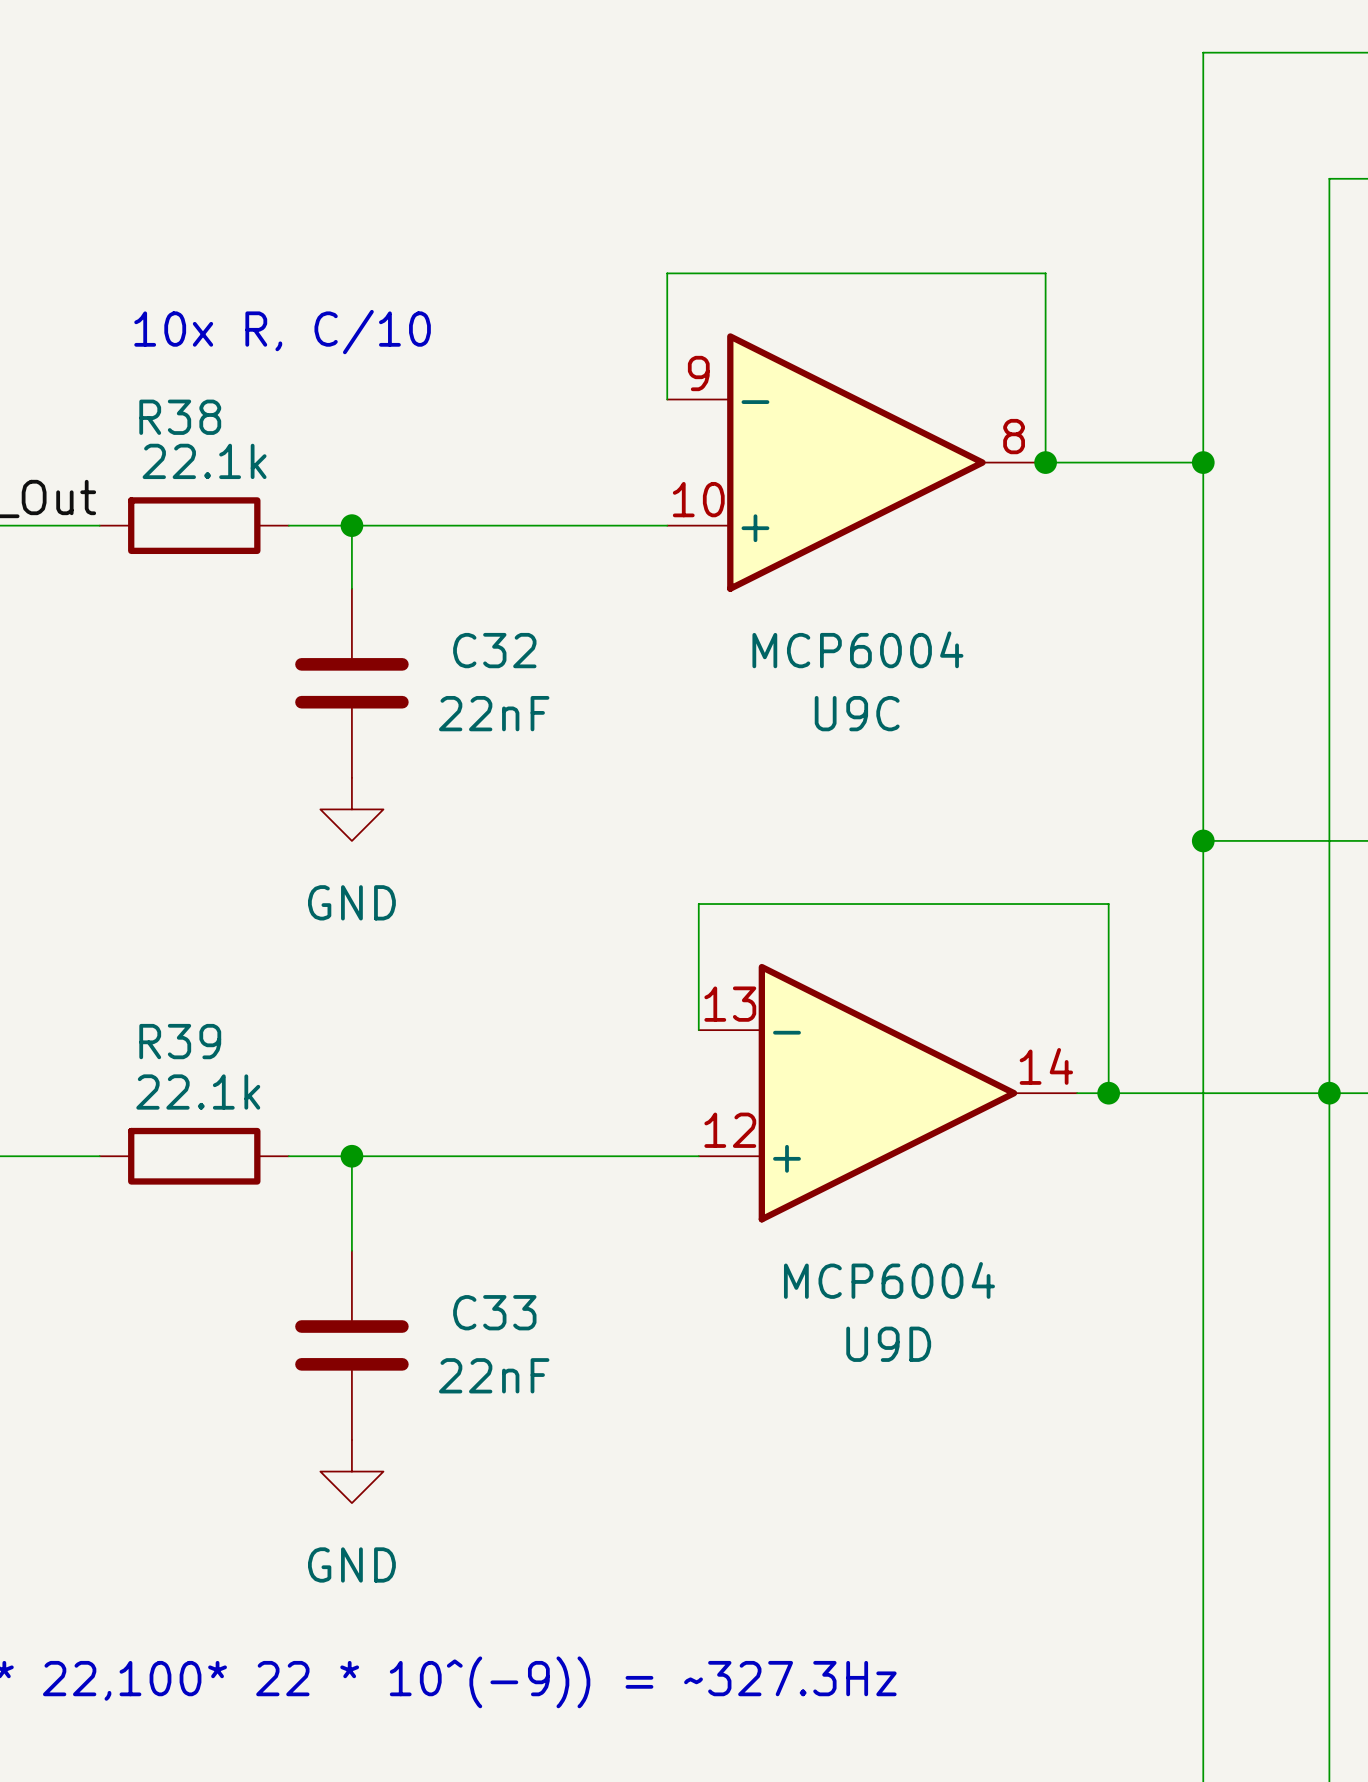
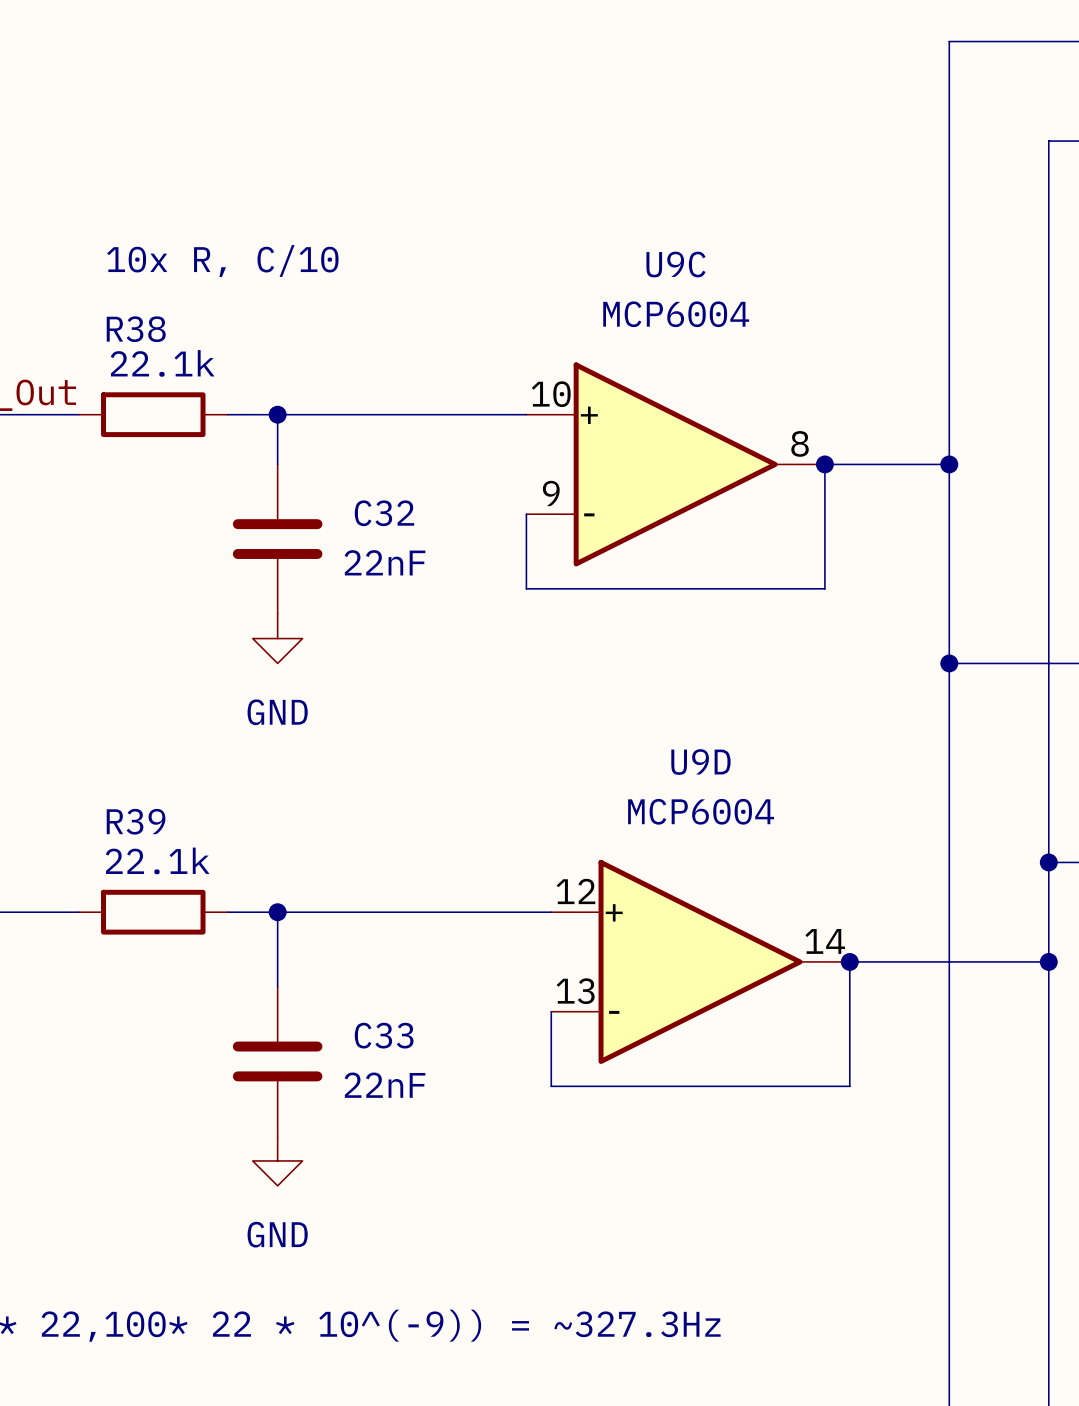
wire: (667, 399) (667, 273) (1045, 273) (1045, 462) (1203, 462) -> none
U9C flip: as is (856, 462) -> up-down (675, 464)
junction: (1045, 462) -> none
junction: (1203, 462) -> none
junction: none -> (824, 464)
wire: none -> (949, 464) (824, 464) (824, 588) (526, 588) (526, 514)
junction: none -> (949, 464)
wire: (698, 1030) (698, 904) (1108, 904) (1108, 1093) -> none
U9D flip: as is (887, 1093) -> up-down (700, 961)
wire: (1077, 1093) (1329, 1093) -> none
junction: (1108, 1093) -> none
junction: none -> (849, 961)
wire: none -> (1048, 961) (849, 961) (849, 1086) (551, 1086) (551, 1011)
junction: none -> (1048, 961)

